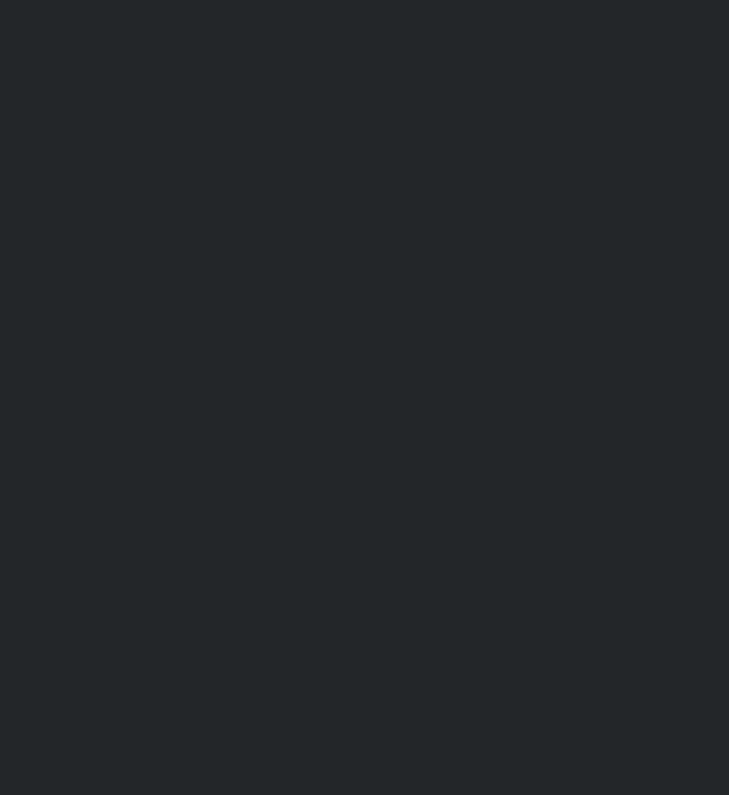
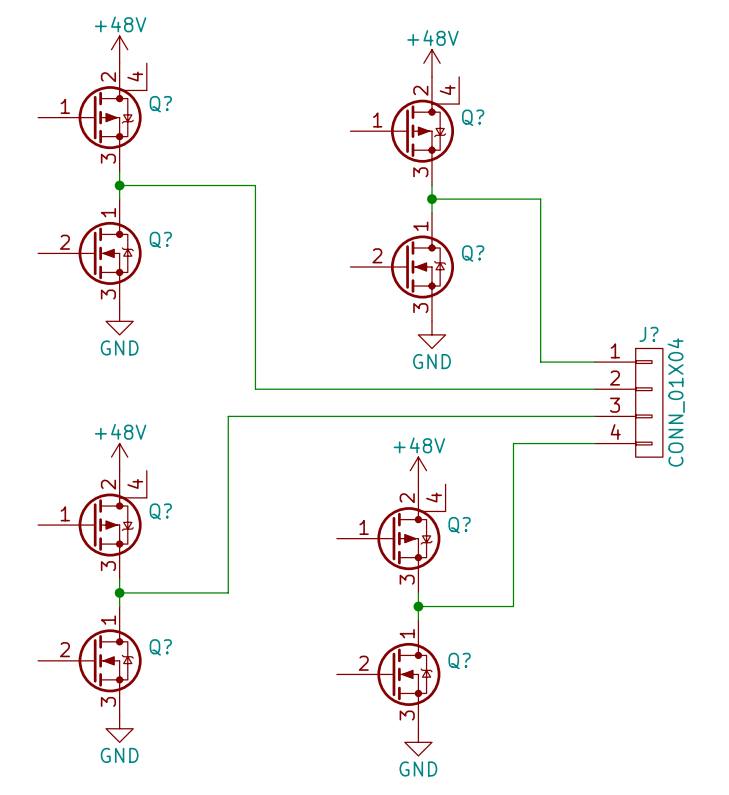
power symbol: none -> +48V (119, 49)
power symbol: none -> +48V (431, 63)
Q?: none -> (92, 117)
Q?: none -> (404, 131)
wire: none -> (119, 171) (119, 199)
wire: none -> (119, 185) (255, 185) (255, 389) (594, 389)
junction: none -> (119, 185)
wire: none -> (431, 185) (431, 212)
wire: none -> (431, 199) (540, 199) (540, 362) (594, 362)
junction: none -> (431, 199)
Q?: none -> (89, 253)
Q?: none -> (402, 267)
power symbol: none -> GND (119, 321)
power symbol: none -> GND (431, 334)
J?: none -> CONN_01X04 (628, 402)
wire: none -> (594, 416) (228, 416) (228, 592) (119, 592)
wire: none -> (594, 443) (513, 443) (513, 606) (418, 606)
power symbol: none -> +48V (119, 457)
power symbol: none -> +48V (418, 470)
Q?: none -> (92, 525)
Q?: none -> (391, 538)
wire: none -> (119, 579) (119, 606)
junction: none -> (119, 592)
wire: none -> (418, 592) (418, 620)
junction: none -> (418, 606)
Q?: none -> (89, 660)
Q?: none -> (388, 674)
power symbol: none -> GND (119, 728)
power symbol: none -> GND (418, 742)

